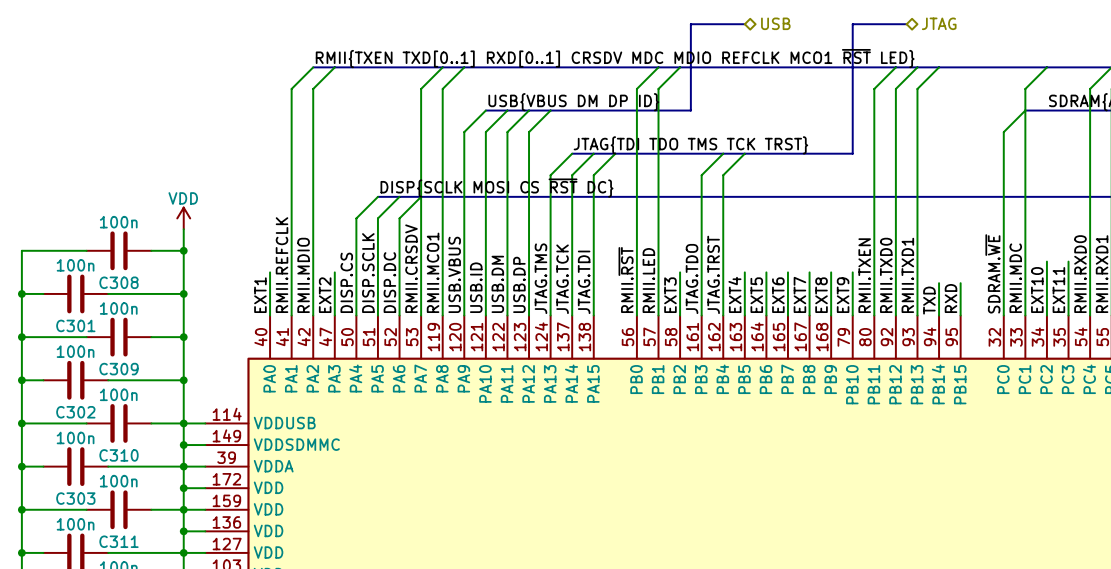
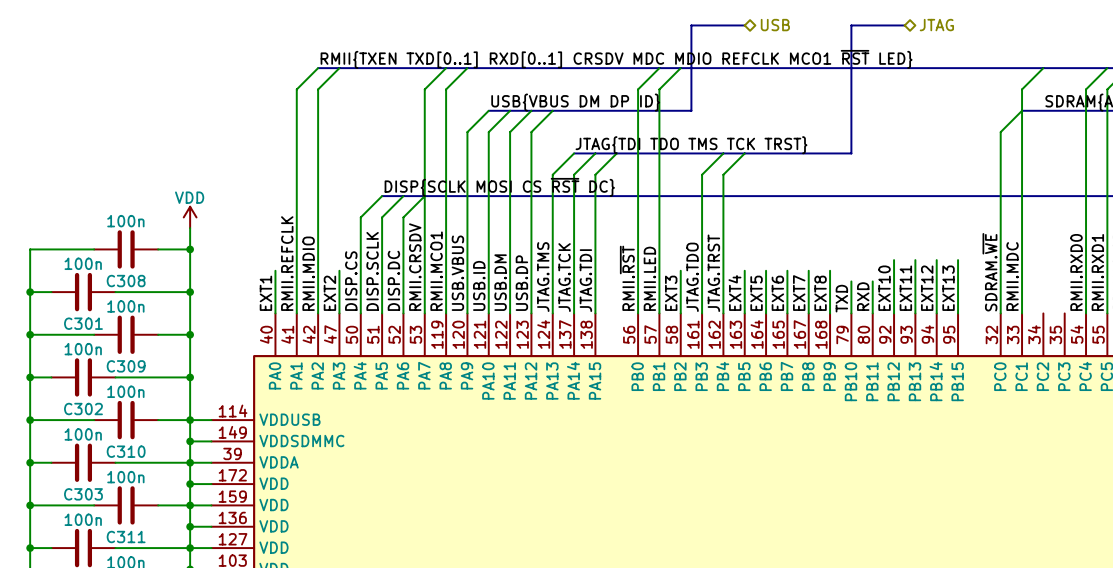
wire: (895, 67) (874, 88) (874, 283) -> none
wire: (917, 67) (895, 88) (895, 261) -> none
wire: (939, 67) (917, 88) (917, 261) -> none
wire: none -> (936, 260) (936, 281)
wire: none -> (958, 260) (958, 281)
wire: (1046, 261) (1046, 315) -> none
wire: (1068, 261) (1068, 315) -> none
wire: (852, 272) (852, 283) -> none
label: RMII.TXEN (864, 275) -> RXD (863, 296)
label: RMII.TXD0 (886, 275) -> EXT10 (884, 288)
label: RMII.TXD1 (907, 275) -> EXT11 (905, 288)
label: EXT10 (1037, 290) -> none
label: EXT11 (1058, 290) -> none
label: EXT9 (843, 295) -> TXD (841, 298)
label: RXD (951, 298) -> EXT13 (948, 288)
label: TXD (929, 300) -> EXT12 (927, 288)

